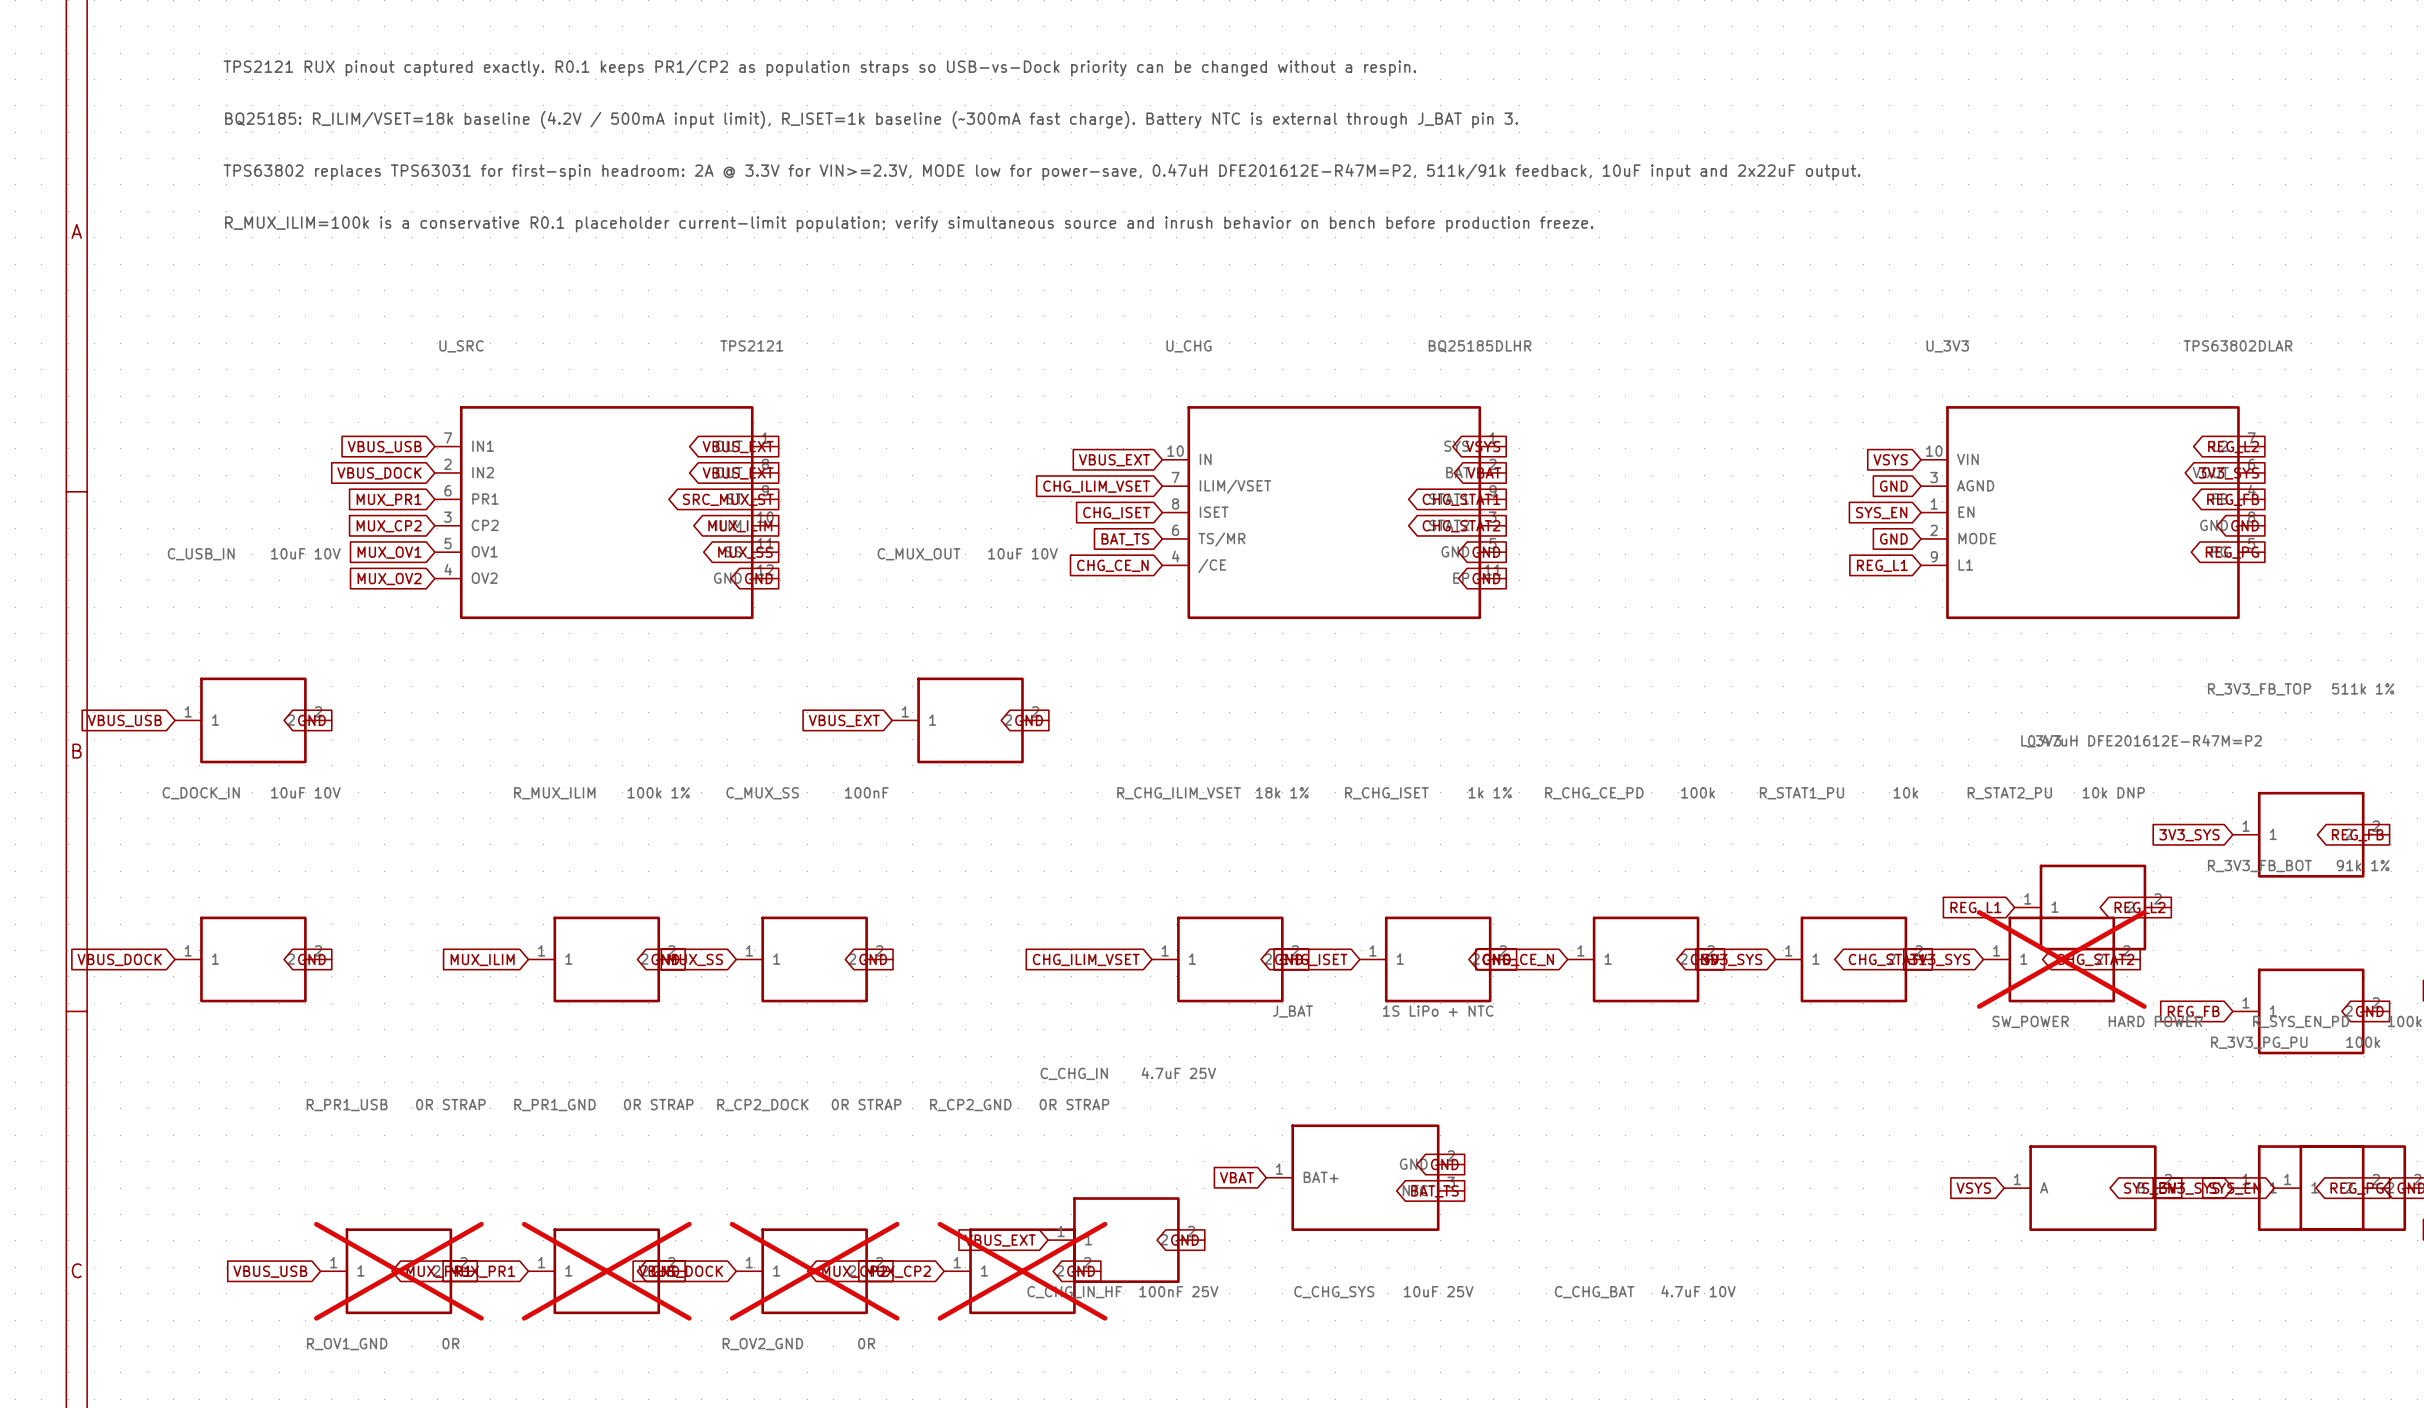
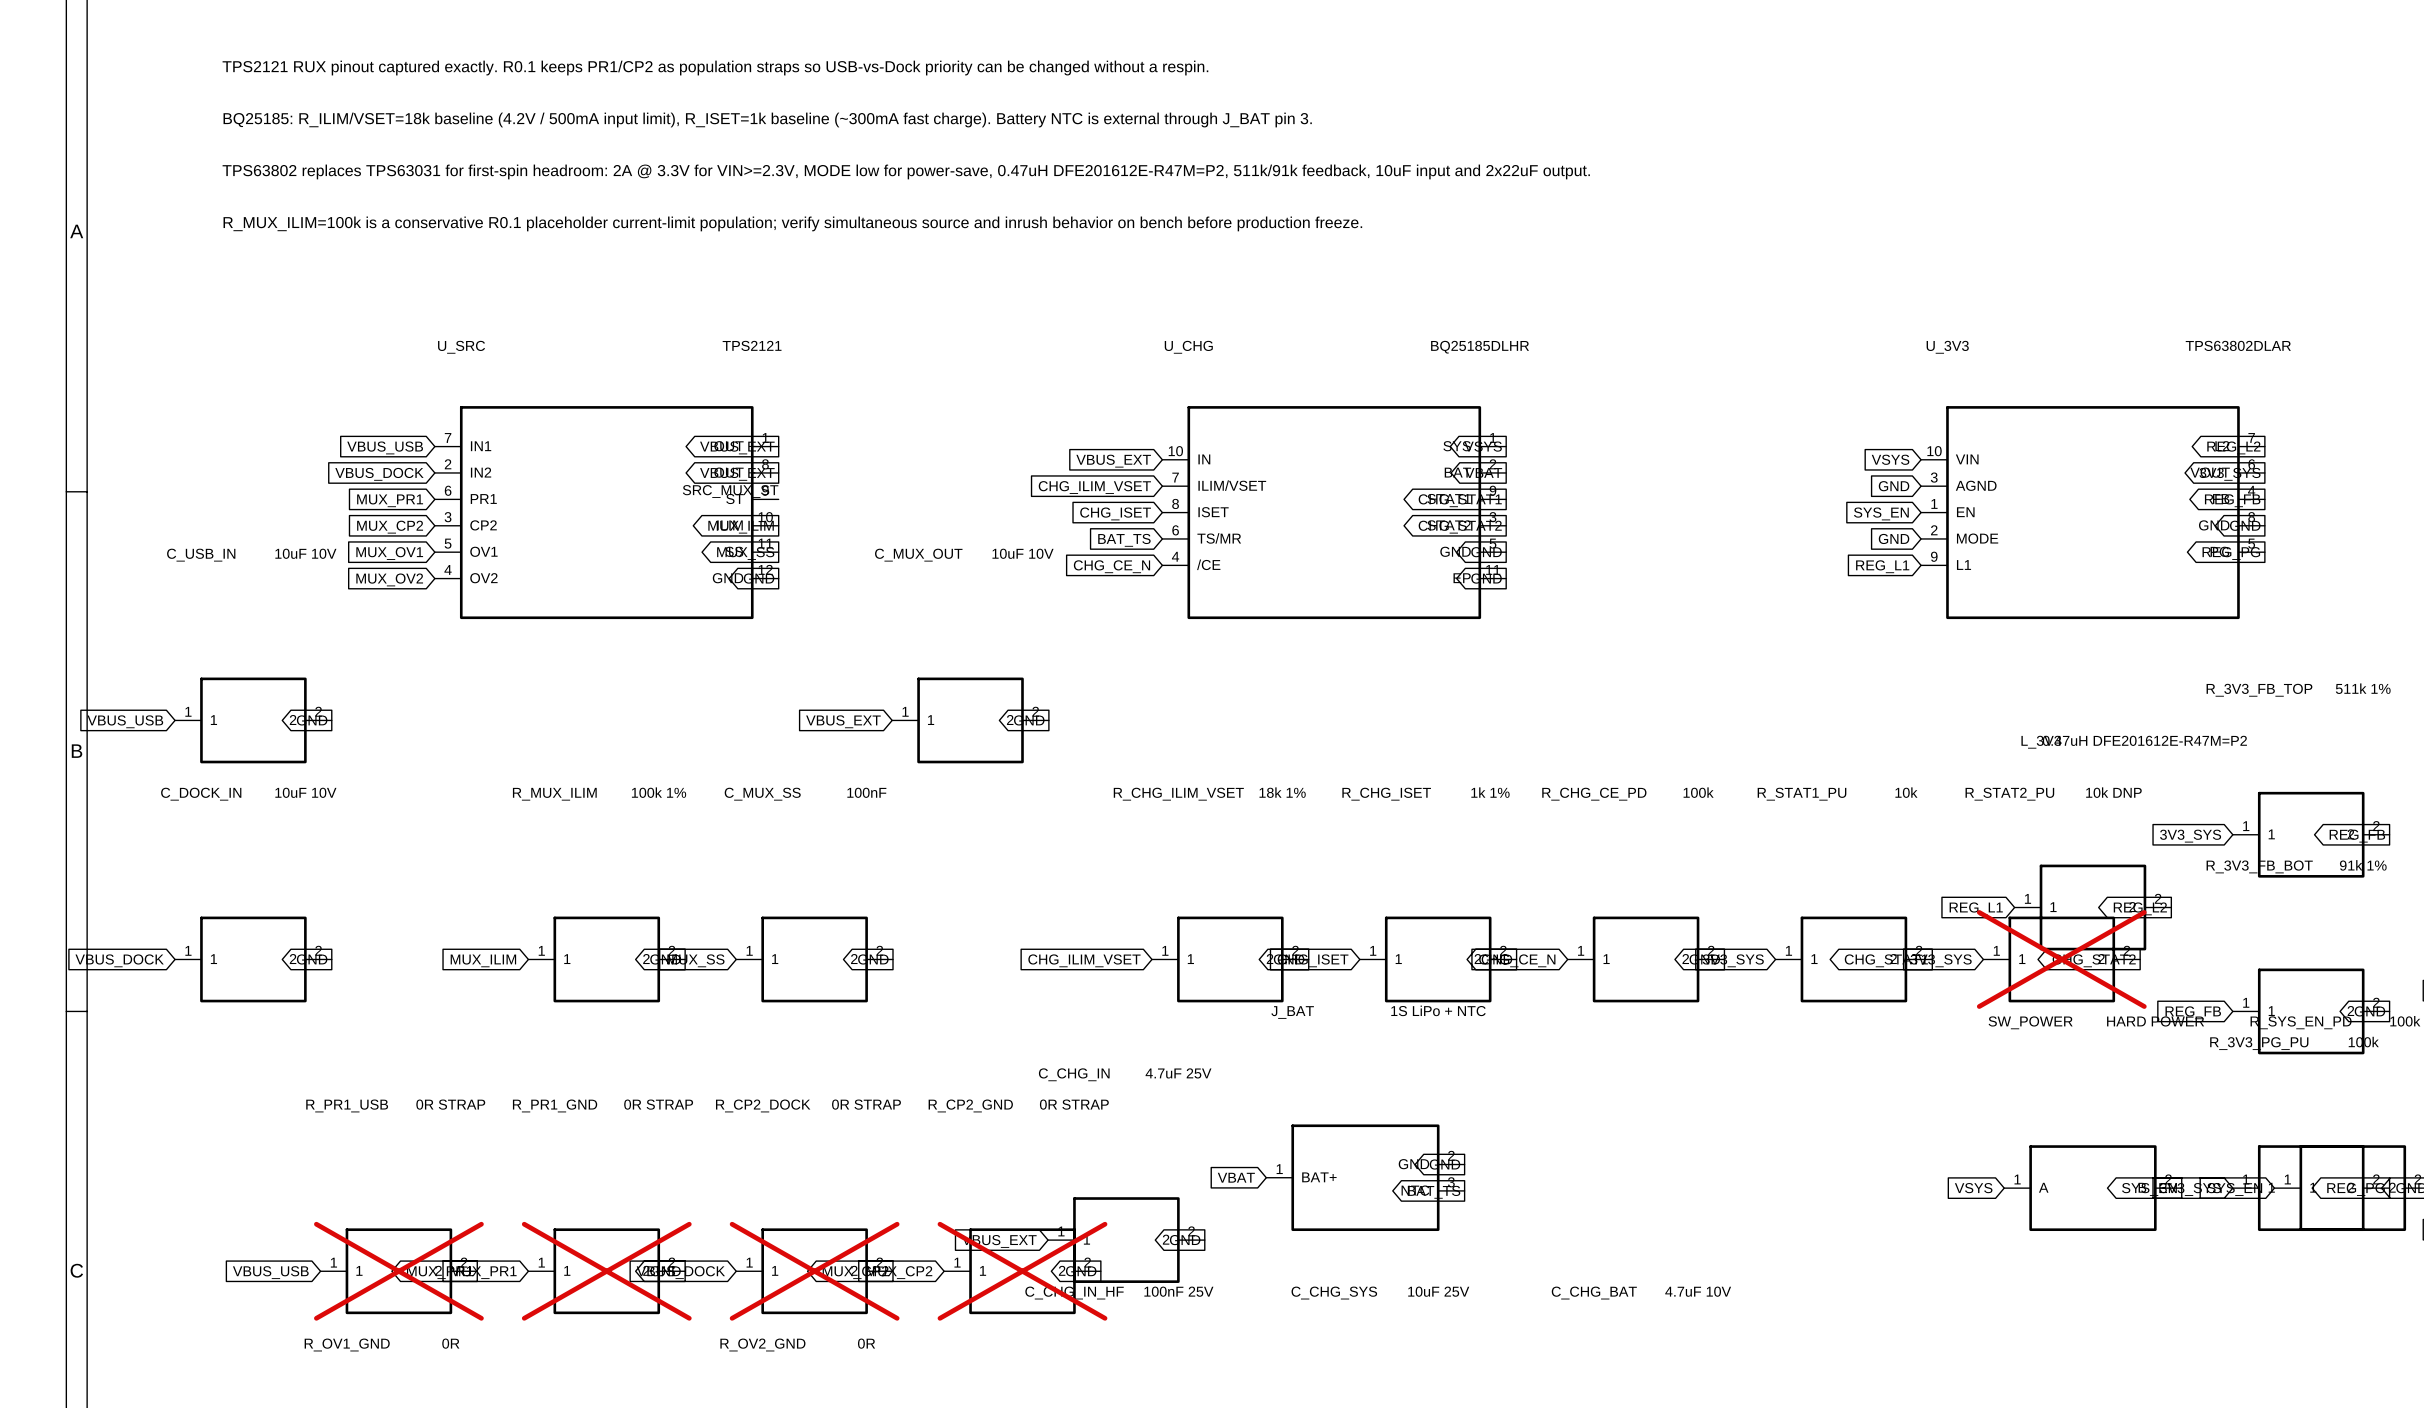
label: none -> SRC_MUX_ST (730, 491)
global label: SRC_MUX_ST (728, 499) -> none

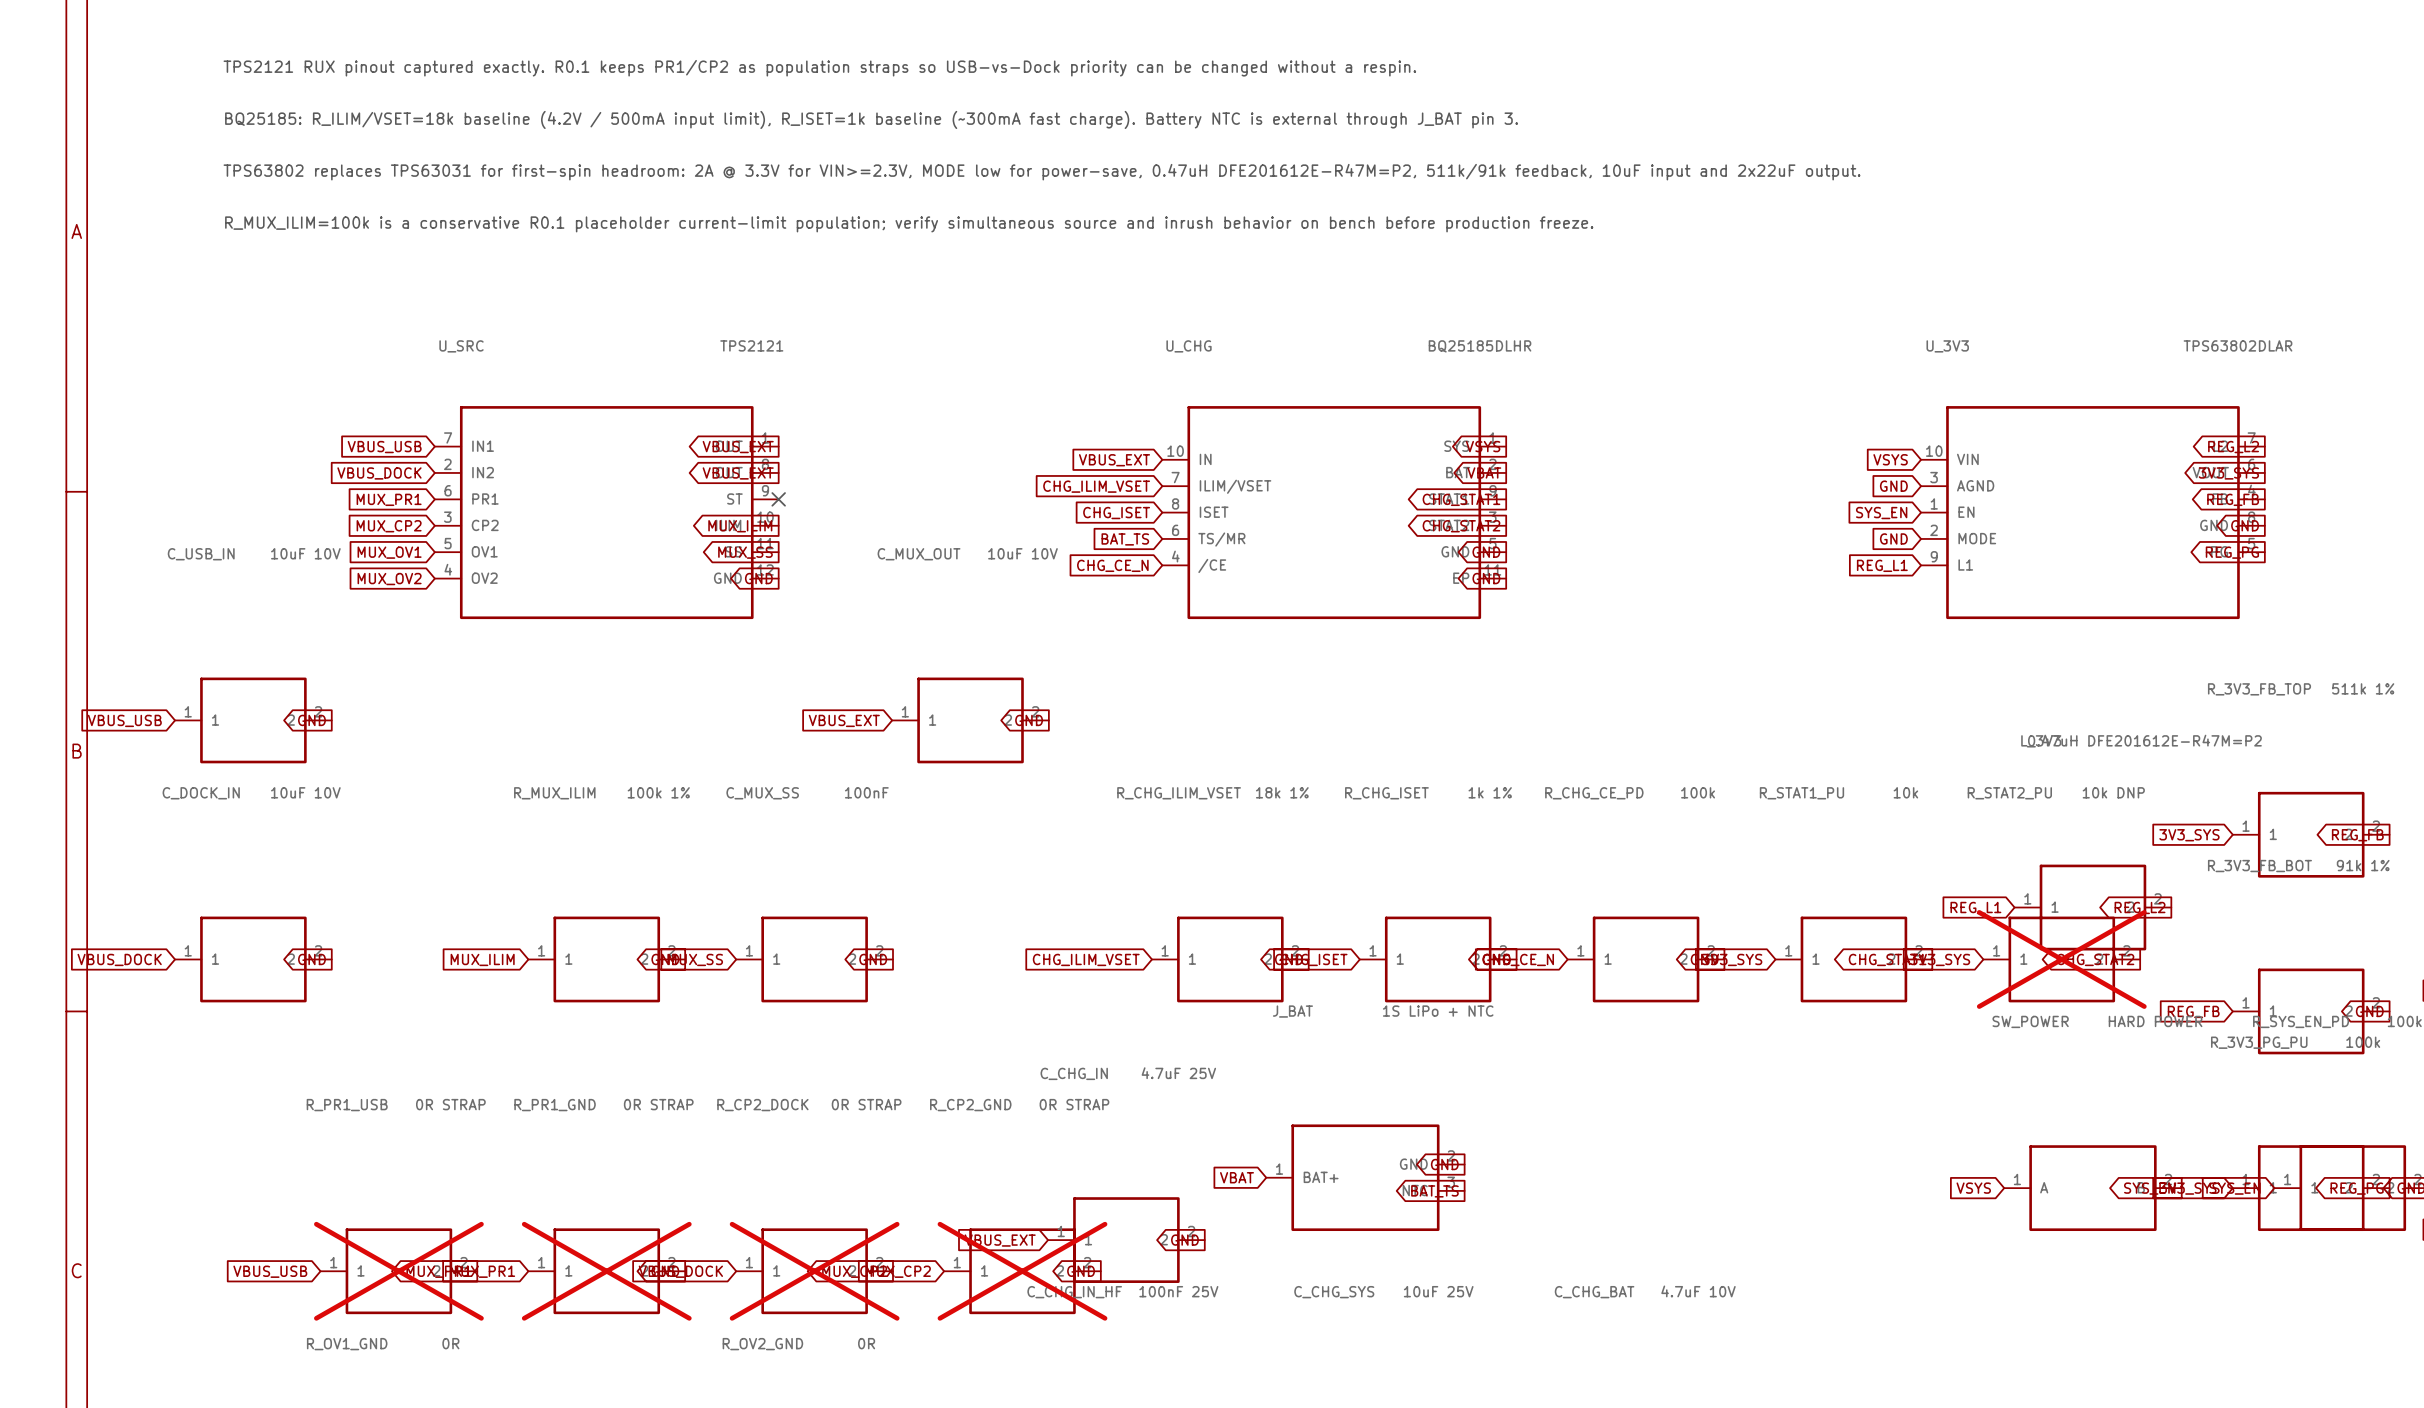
label: SRC_MUX_ST (730, 491) -> none
no-connect mark: none -> (778, 499)

